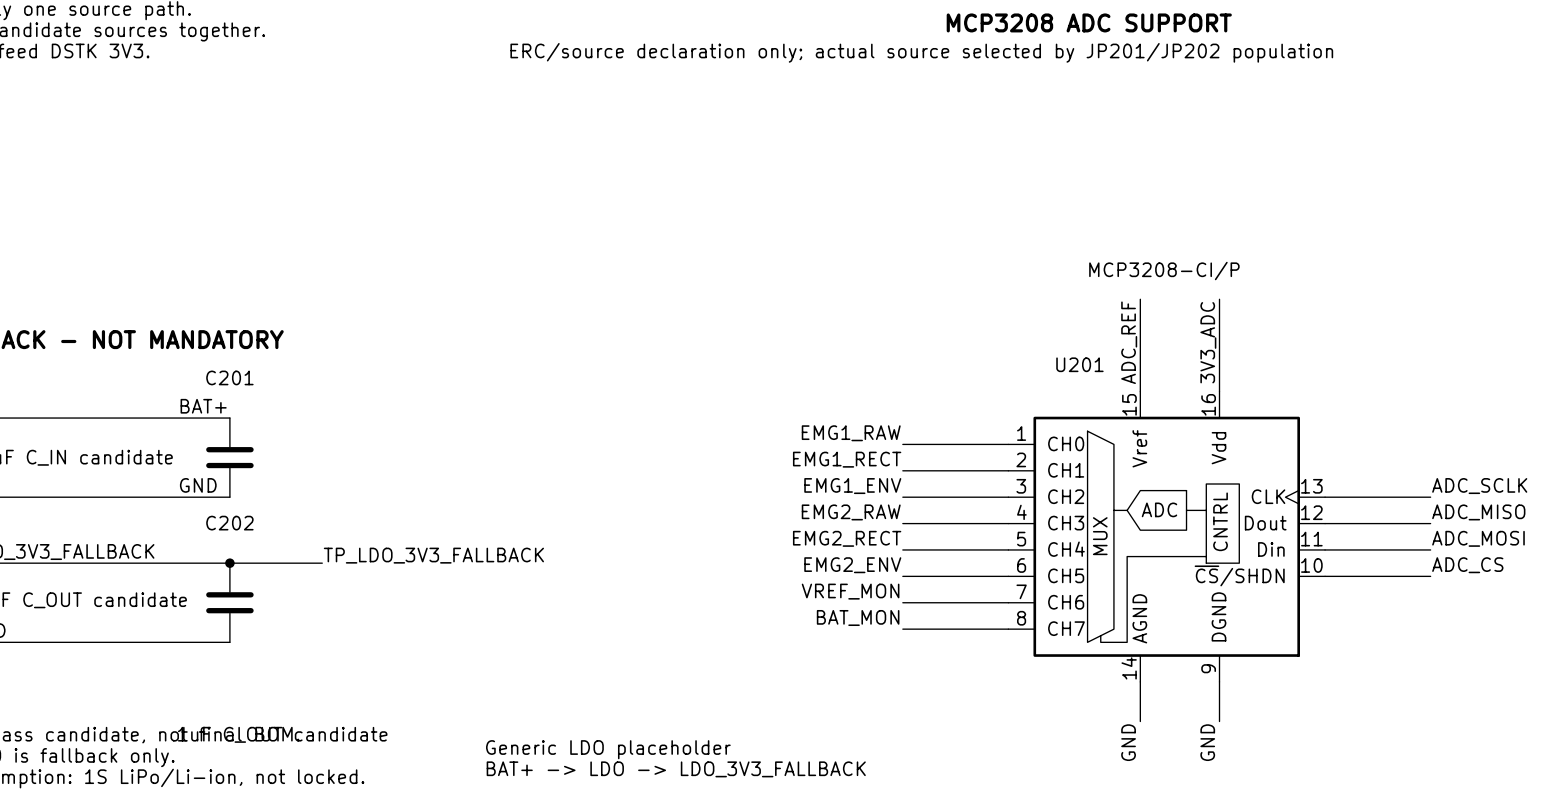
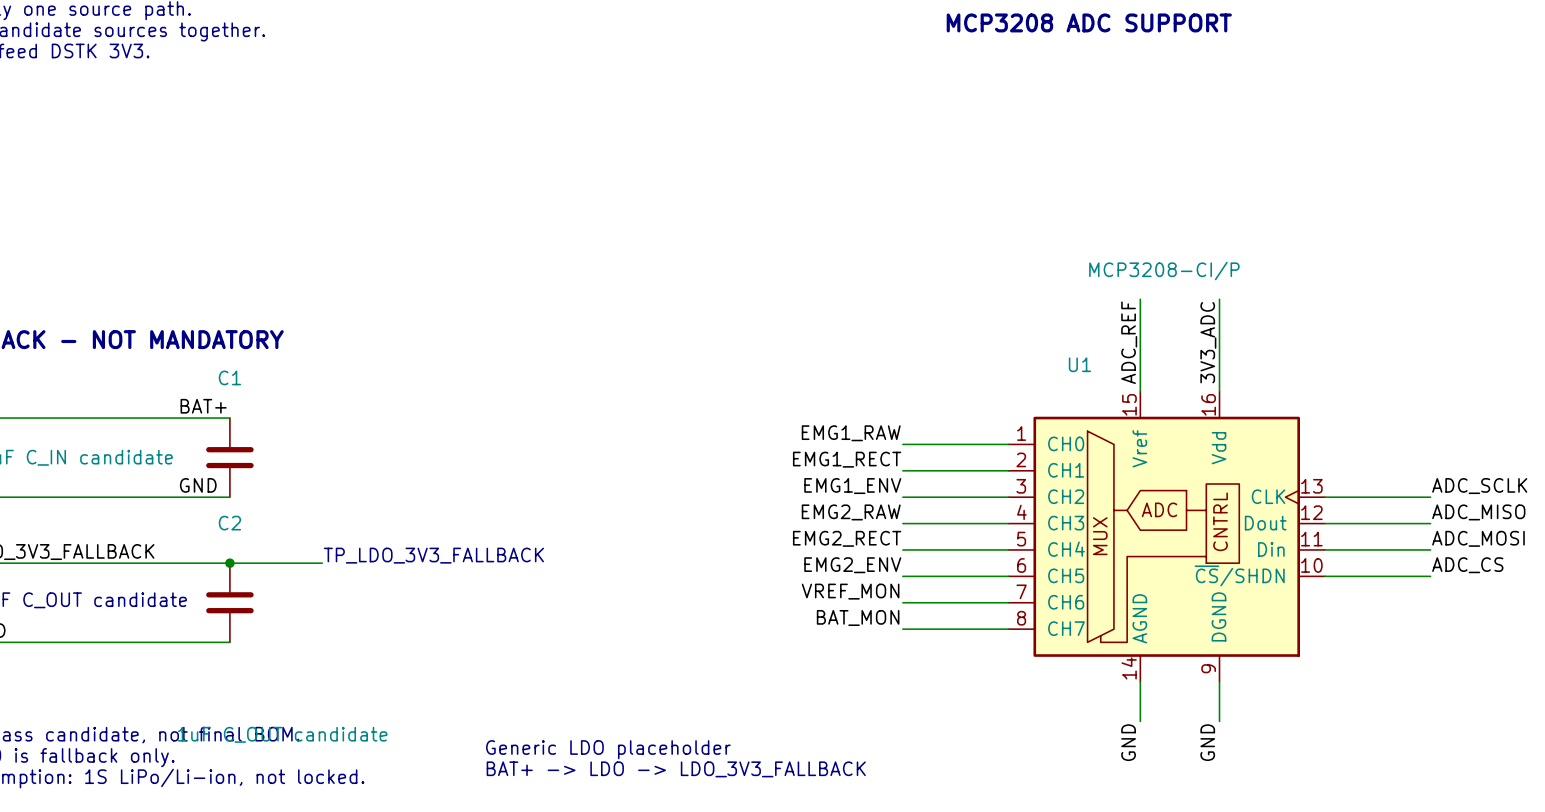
text: ERC/source declaration only; actual source selected by JP201/JP202 population (921, 52) -> none
U201 name: U201 (1079, 364) -> U1 (1079, 364)
C201 name: C201 (229, 377) -> C1 (229, 377)
C202 name: C202 (229, 523) -> C2 (229, 523)

